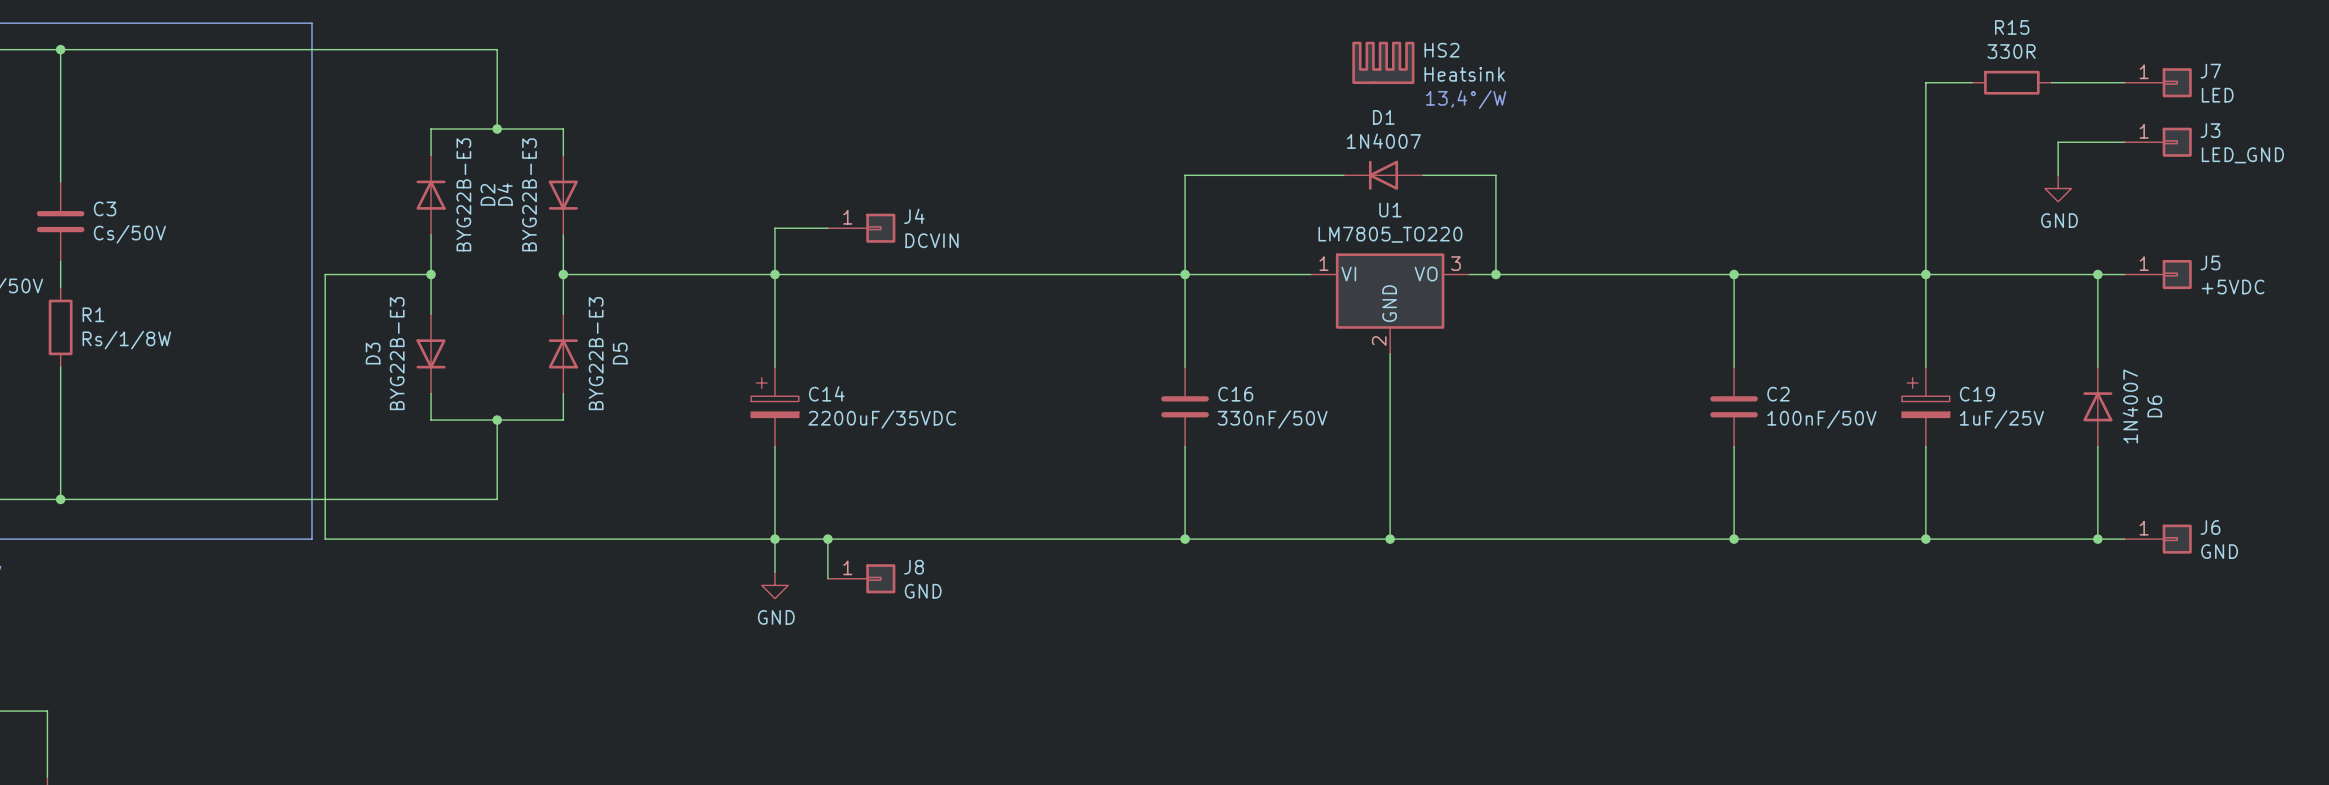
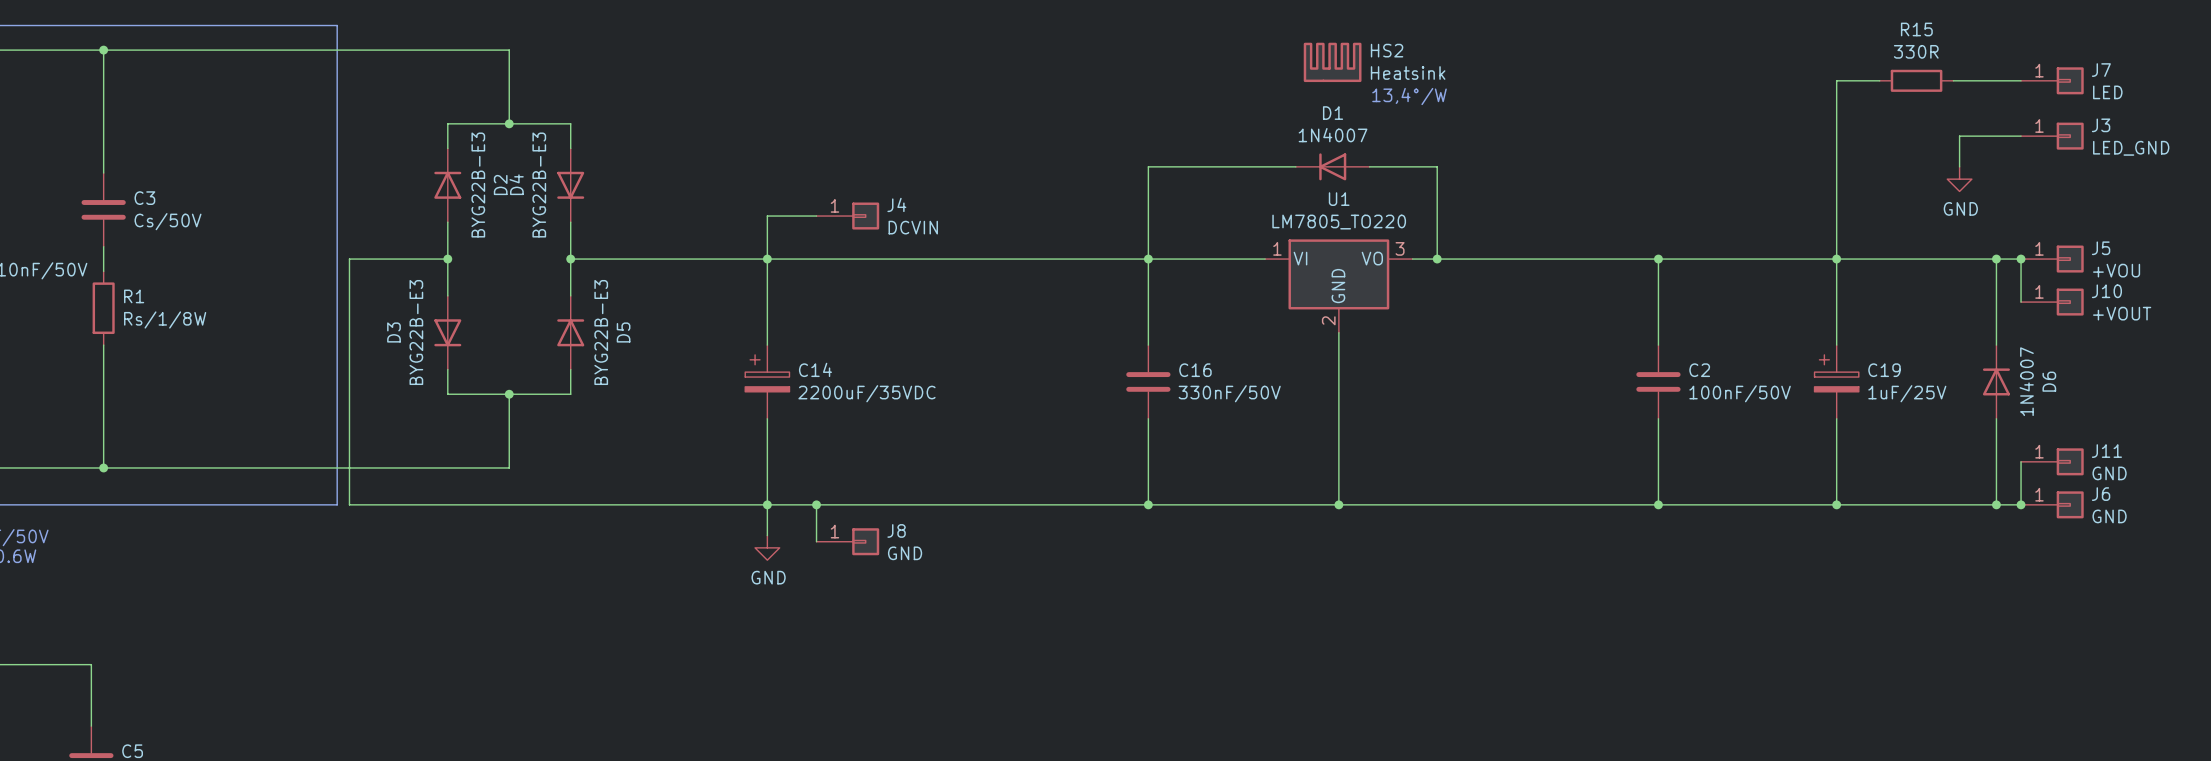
wire: none -> (2021, 259) (2021, 302)
junction: none -> (2021, 259)
J5 value: +5VDC (2233, 287) -> +VOU (2116, 270)
J10: none -> +VOUT (2052, 302)
wire: none -> (2021, 461) (2021, 504)
J11: none -> GND (2052, 461)
junction: none -> (2021, 504)

